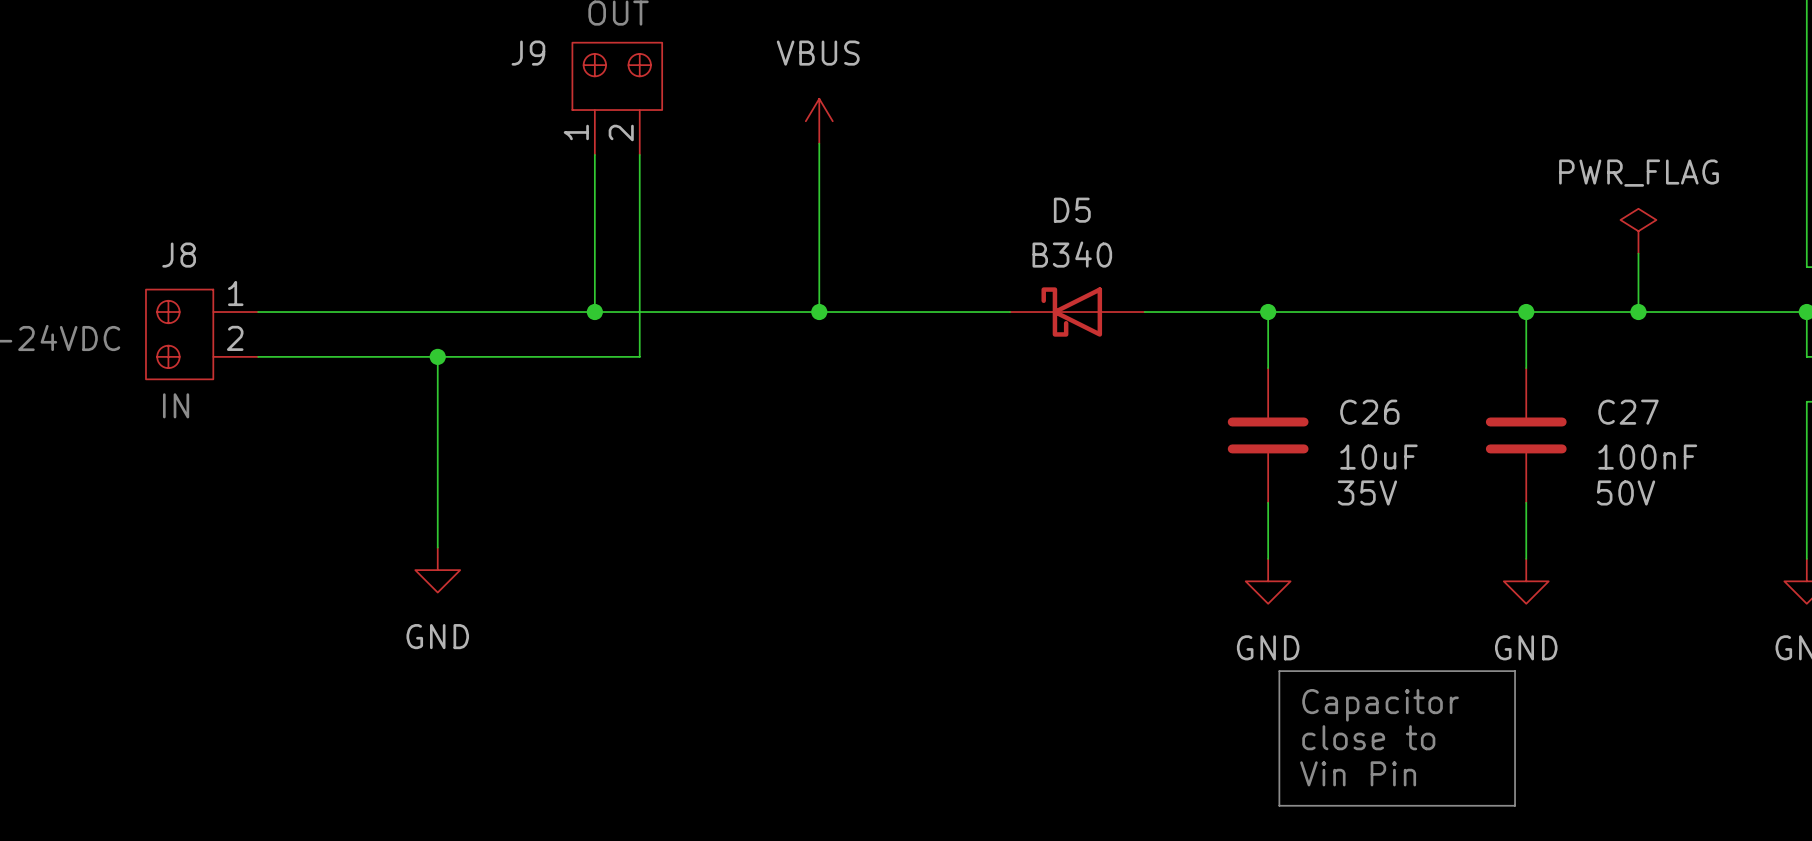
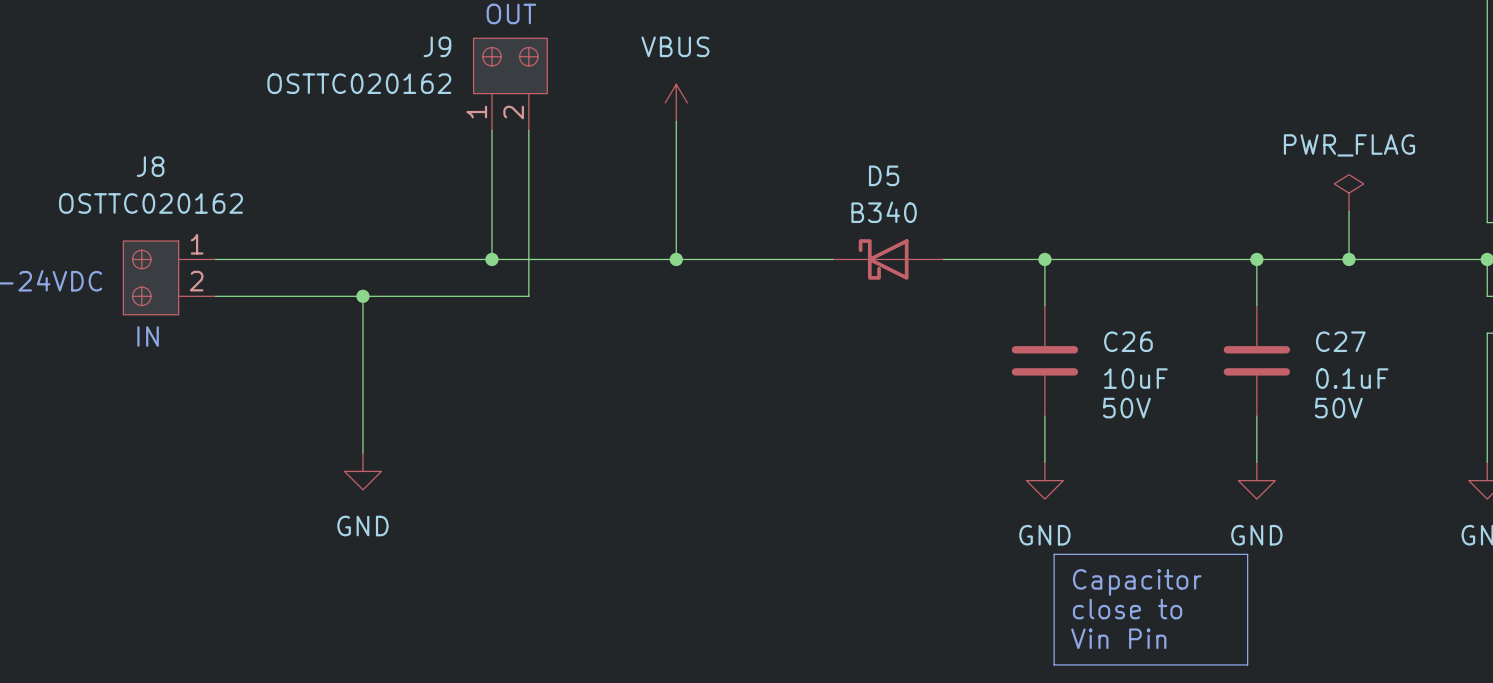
J9 value: none -> OSTTC020162 (359, 83)
J8 value: none -> OSTTC020162 (151, 203)
J8 name position: J8 (179, 255) -> J8 (150, 166)
C27 value: 100nF (1647, 457) -> 0.1uF (1352, 378)
C26 text: 35V (1367, 492) -> 50V (1126, 408)

